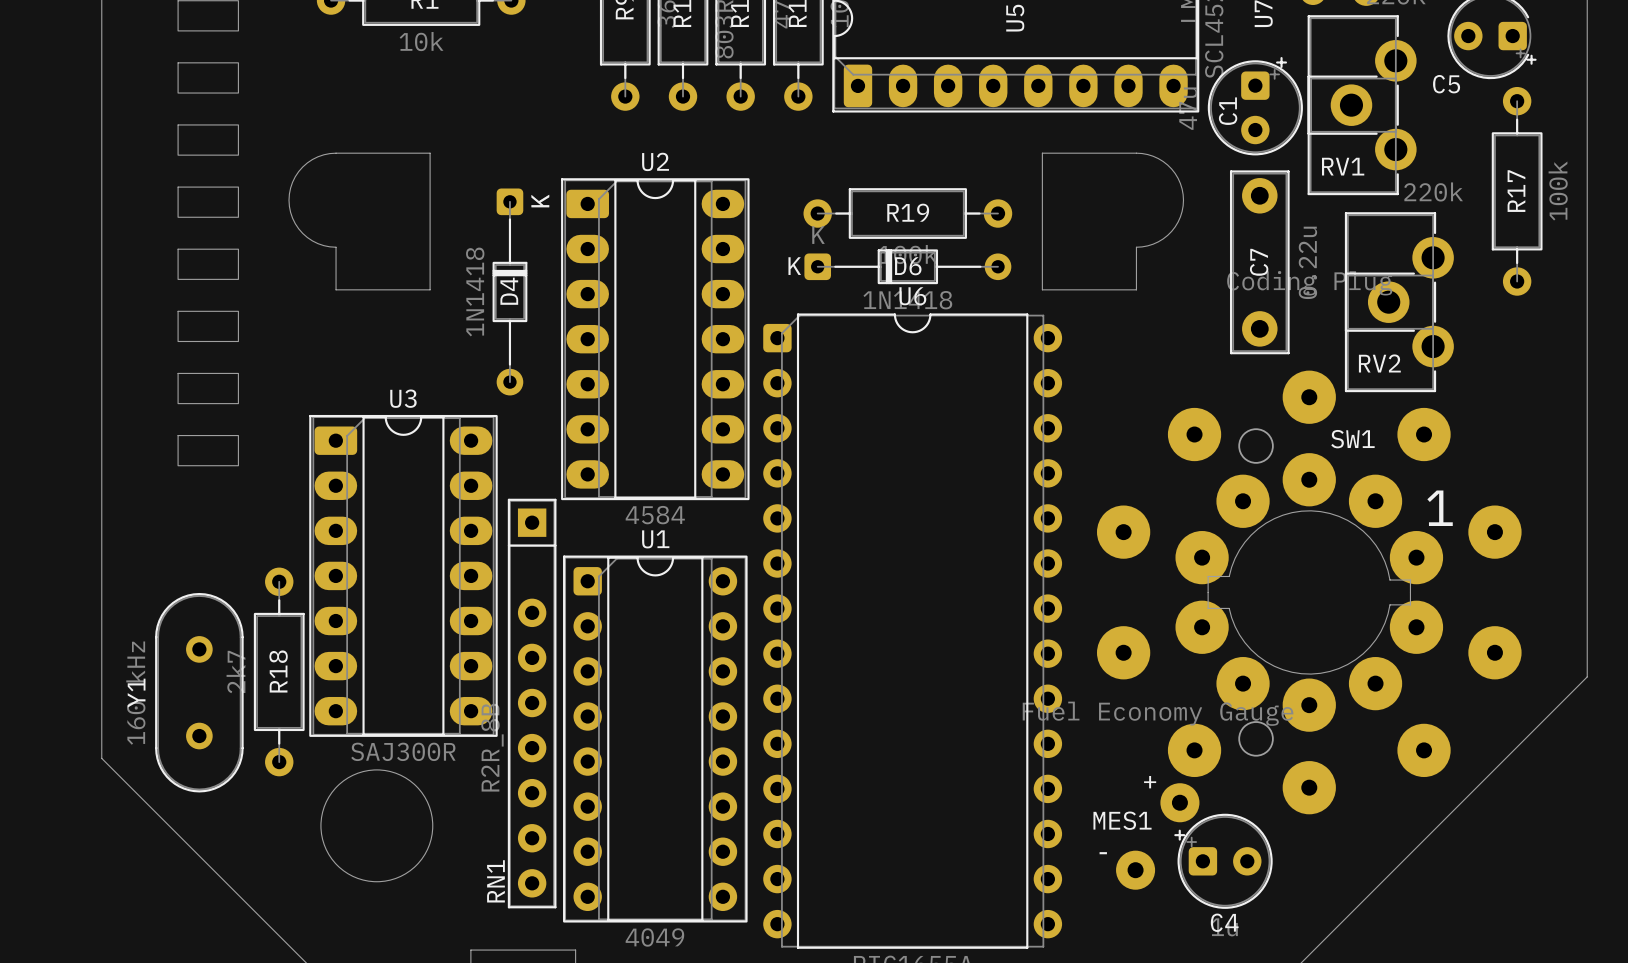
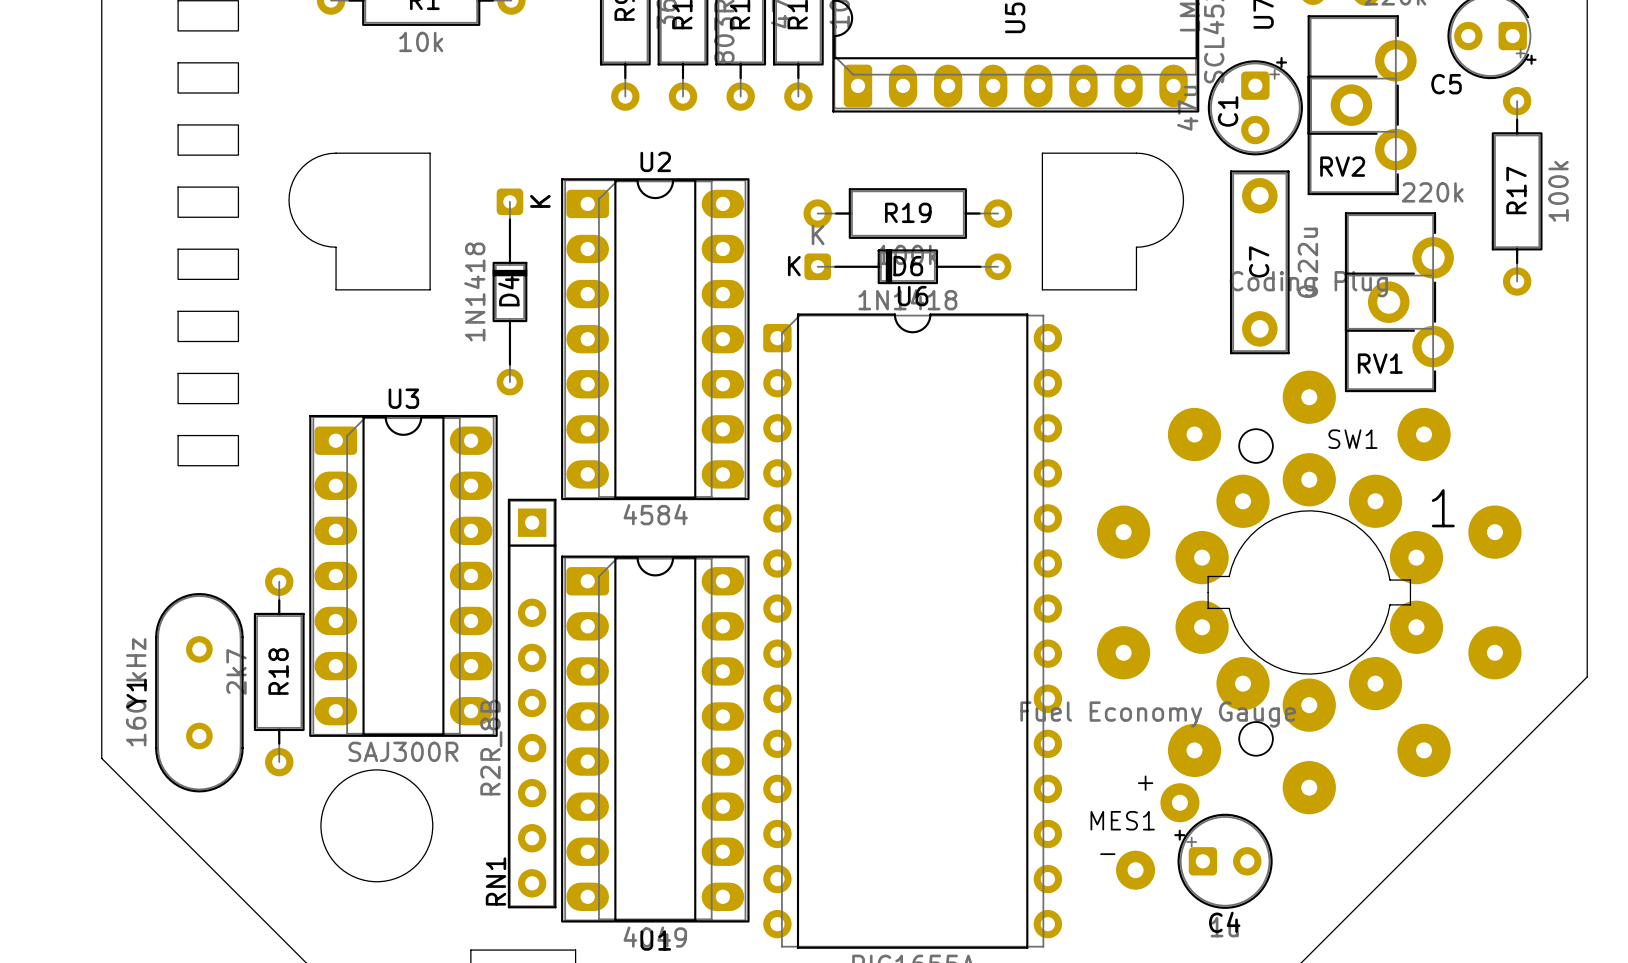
RV1 name: RV1 (1343, 166) -> RV2 (1342, 166)
RV2 name: RV2 (1379, 363) -> RV1 (1380, 363)
U1 name position: U1 (655, 539) -> U1 (655, 940)
U1 footprint: [563, 555, 748, 923] -> [561, 555, 750, 923]

